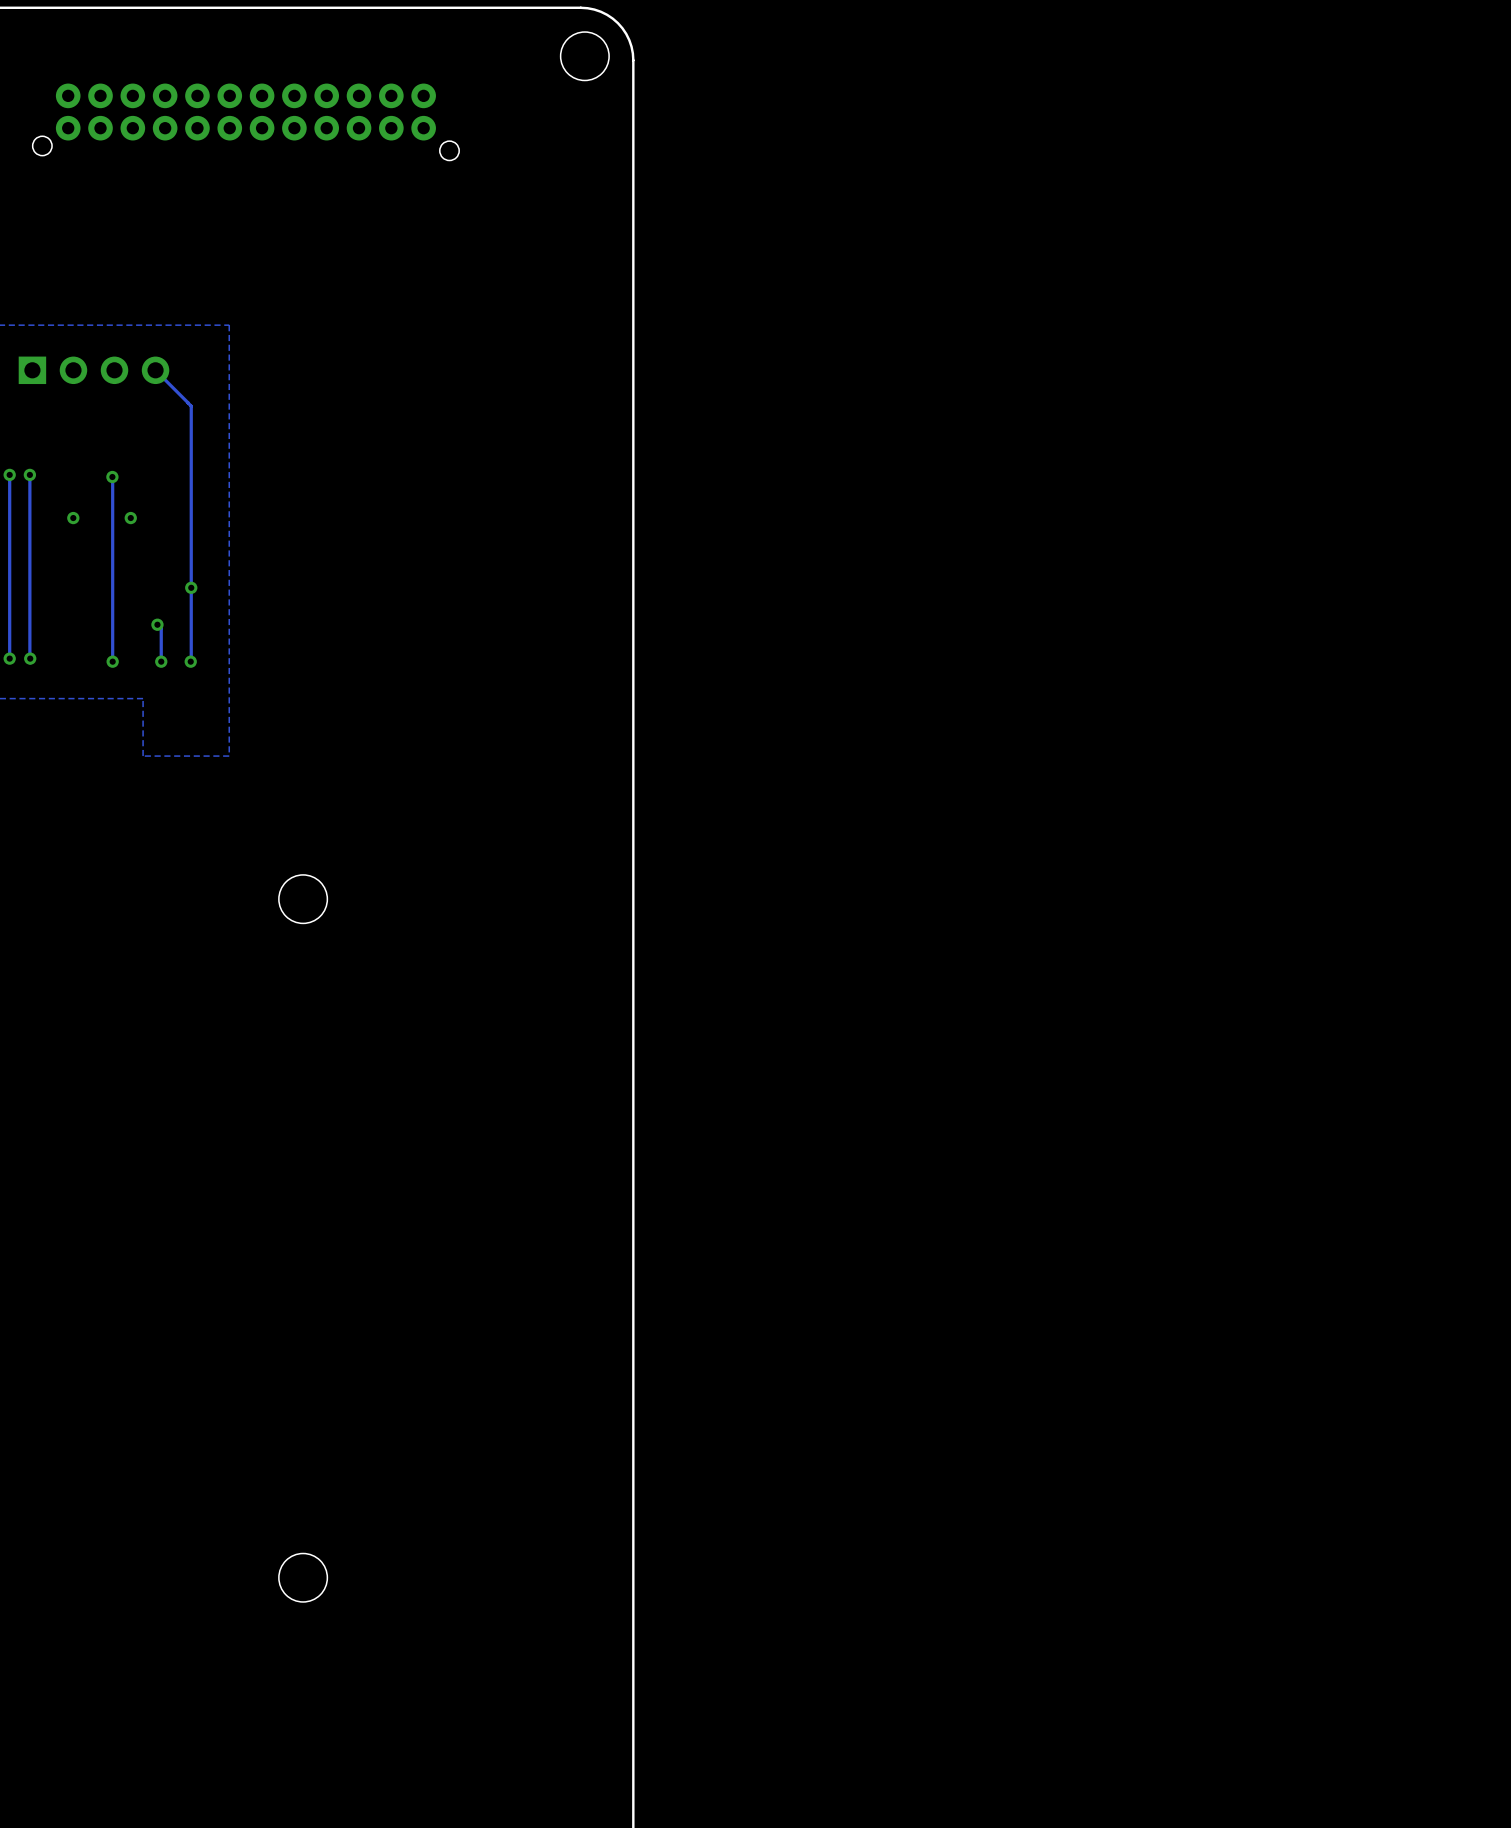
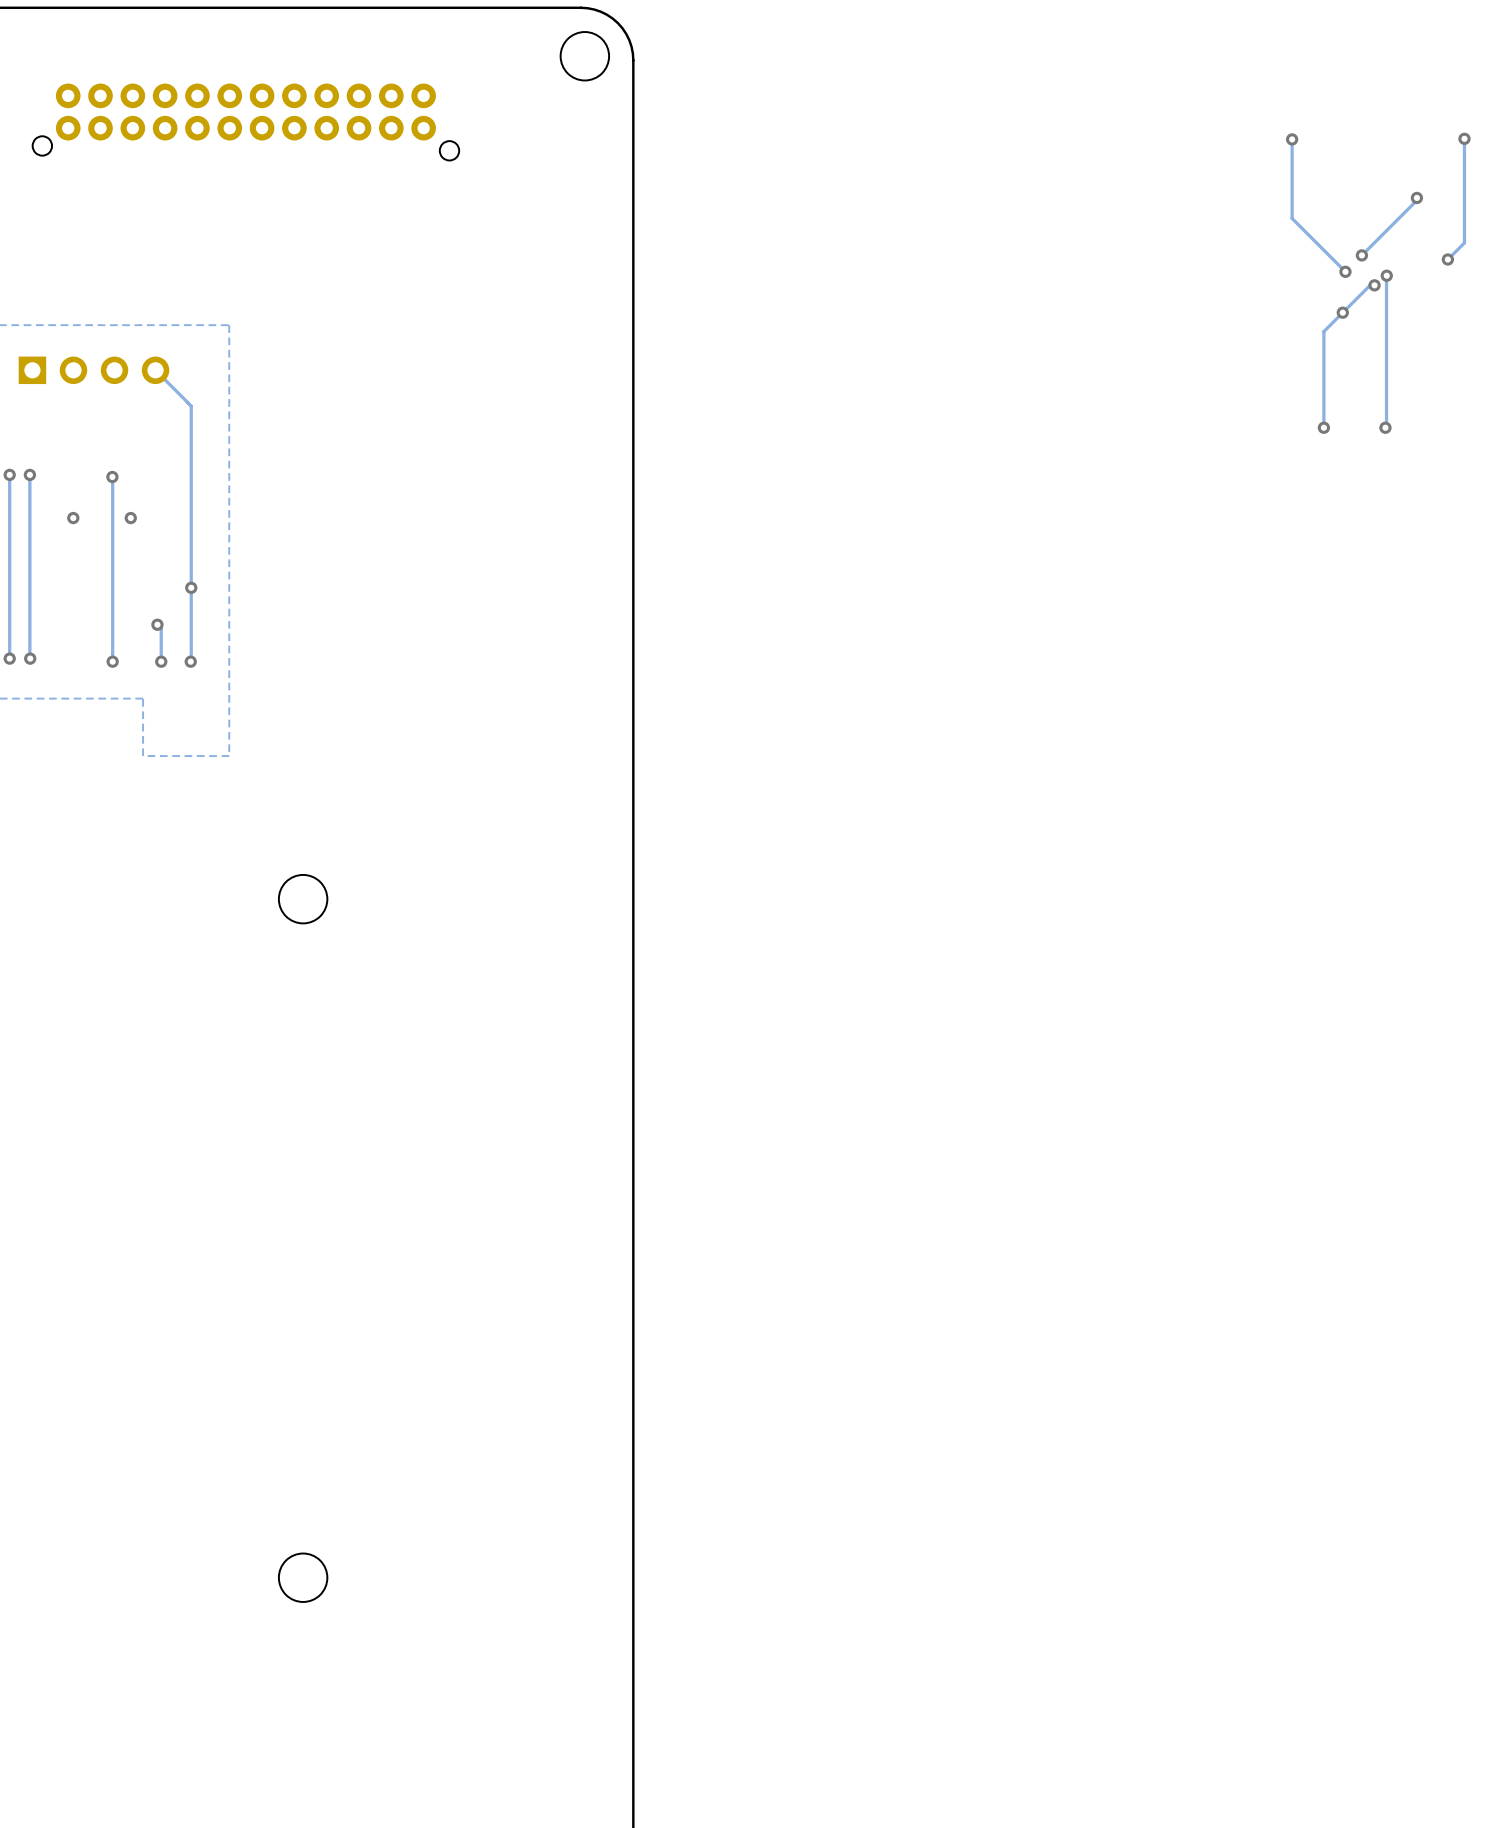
track: none -> (1464, 138) (1464, 242) (1447, 259)
via: none -> (1464, 138)
track: none -> (1292, 139) (1292, 218) (1345, 271)
via: none -> (1292, 139)
track: none -> (1416, 197) (1416, 200) (1361, 255)
via: none -> (1416, 197)
via: none -> (1361, 255)
via: none -> (1447, 259)
via: none -> (1345, 271)
track: none -> (1386, 275) (1385, 427)
via: none -> (1386, 275)
track: none -> (1374, 285) (1370, 285) (1323, 331) (1323, 427)
via: none -> (1374, 285)
via: none -> (1342, 312)
via: none -> (1323, 427)
via: none -> (1385, 427)

